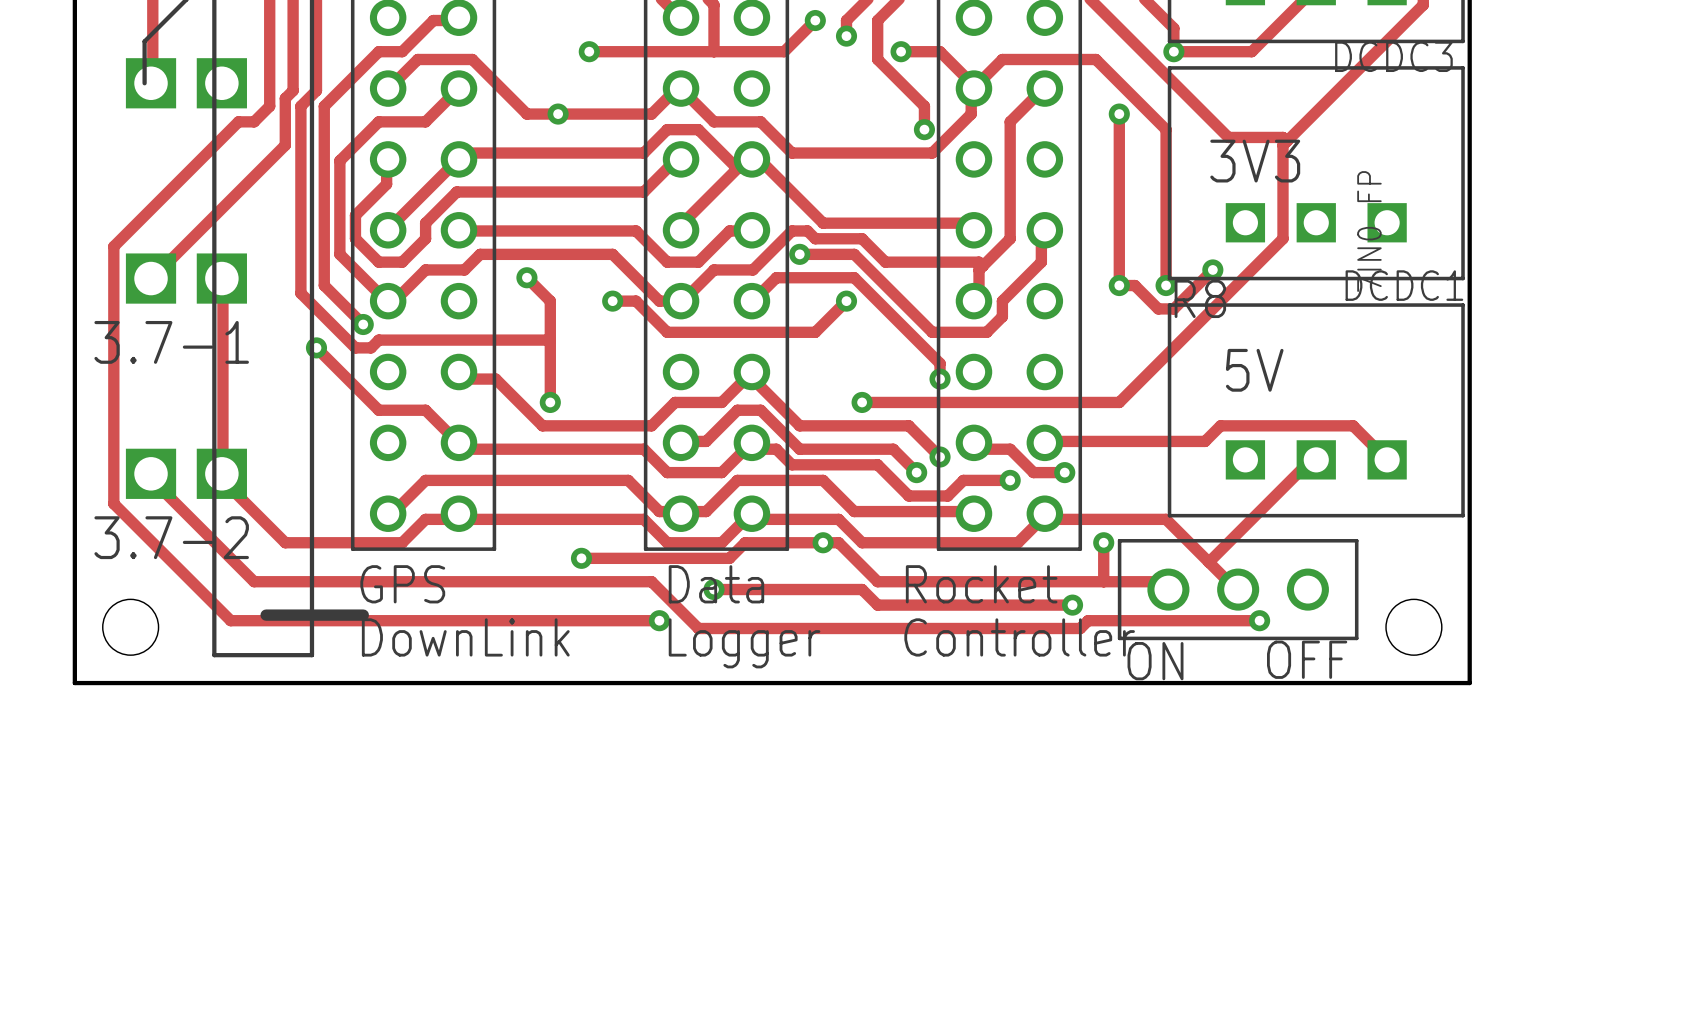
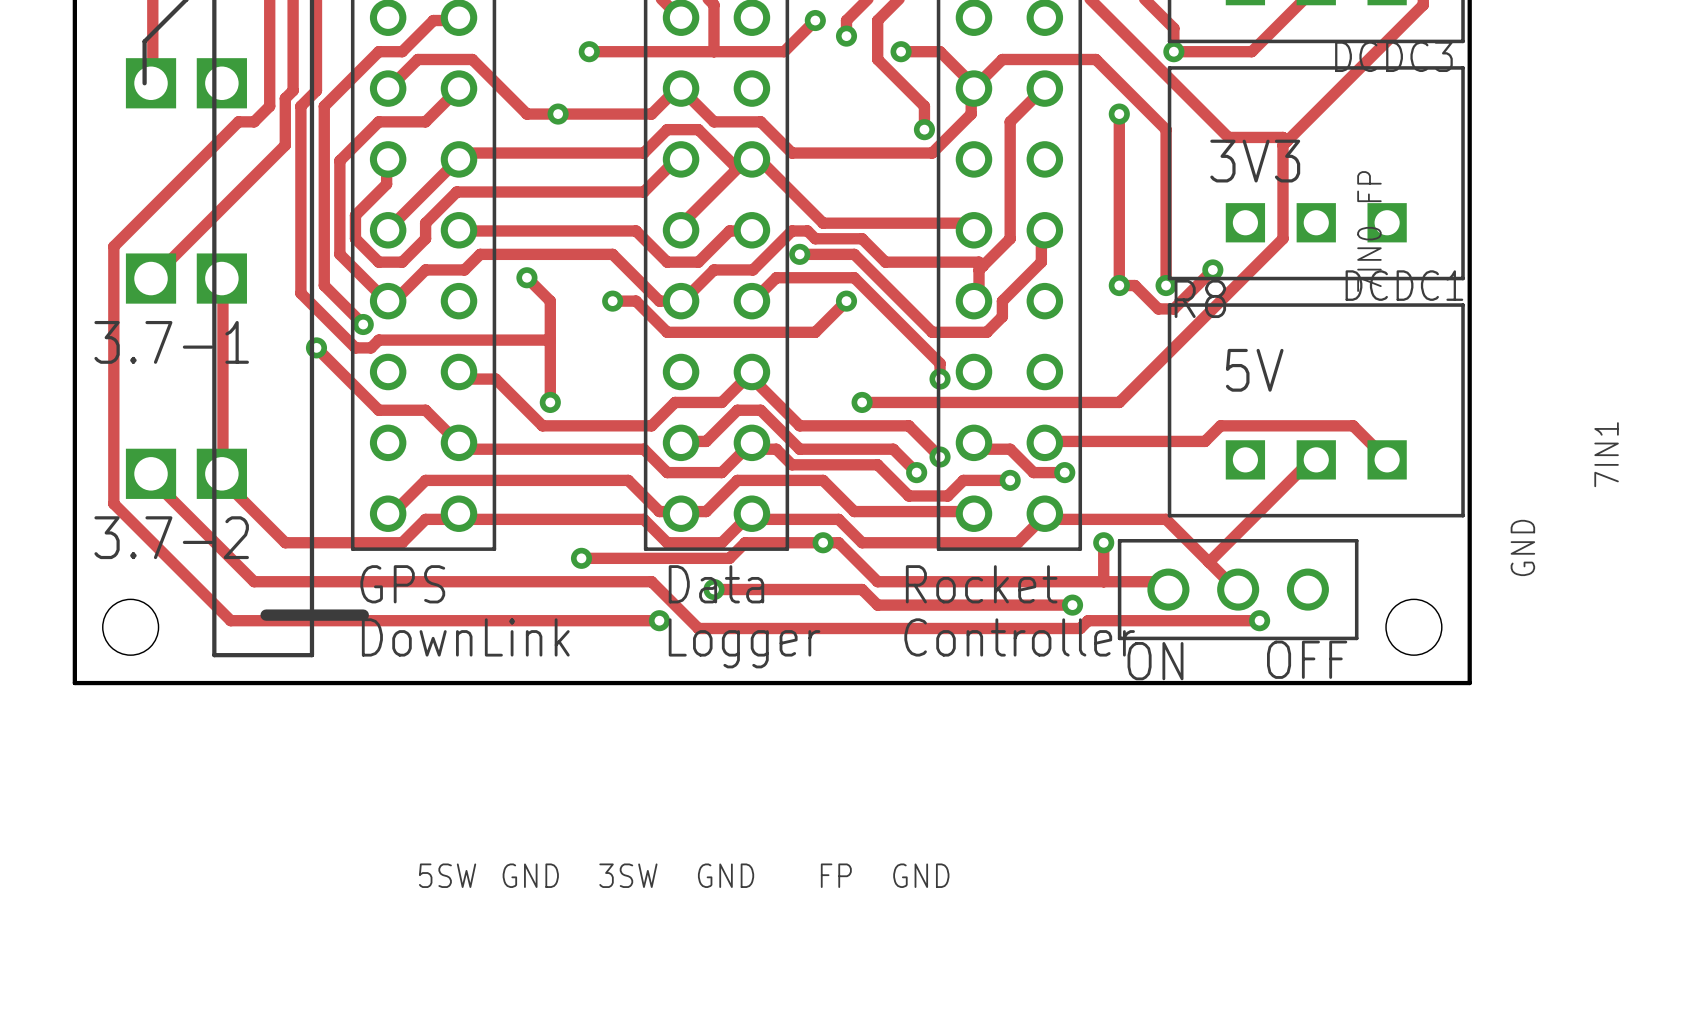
text: none -> 7IN1 (1606, 454)
text: none -> GND (1522, 547)
text: none -> 5SW (447, 875)
text: none -> GND (530, 875)
text: none -> 3SW (628, 875)
text: none -> GND (726, 875)
text: none -> FP (836, 875)
text: none -> GND (921, 875)

